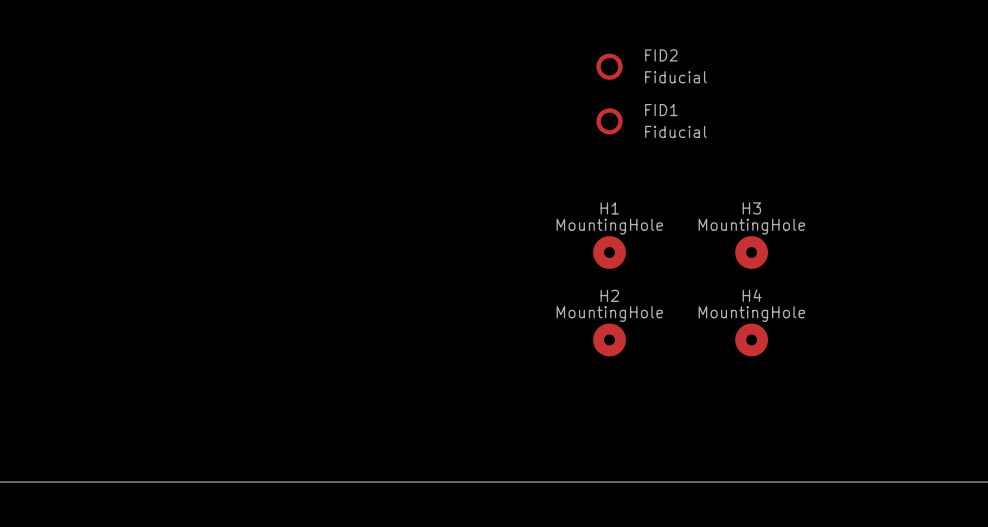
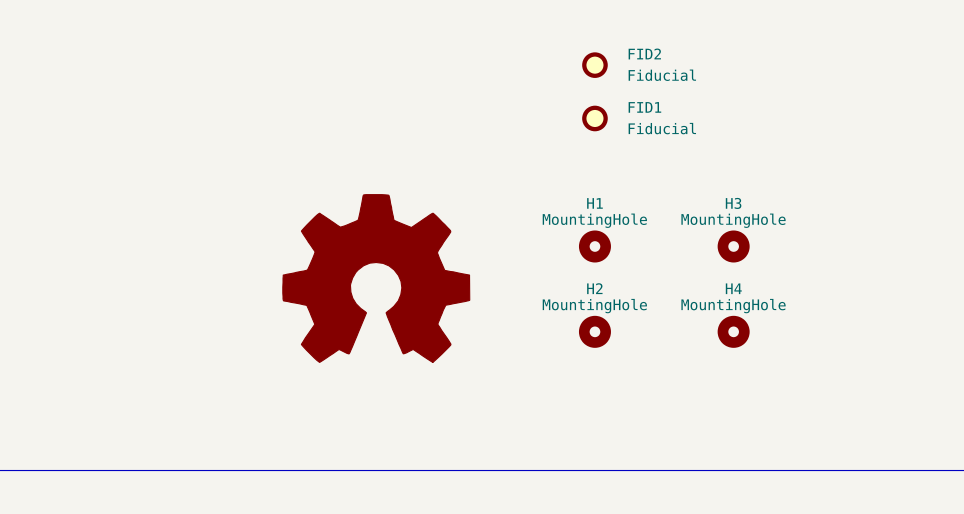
power symbol: none -> (376, 278)

